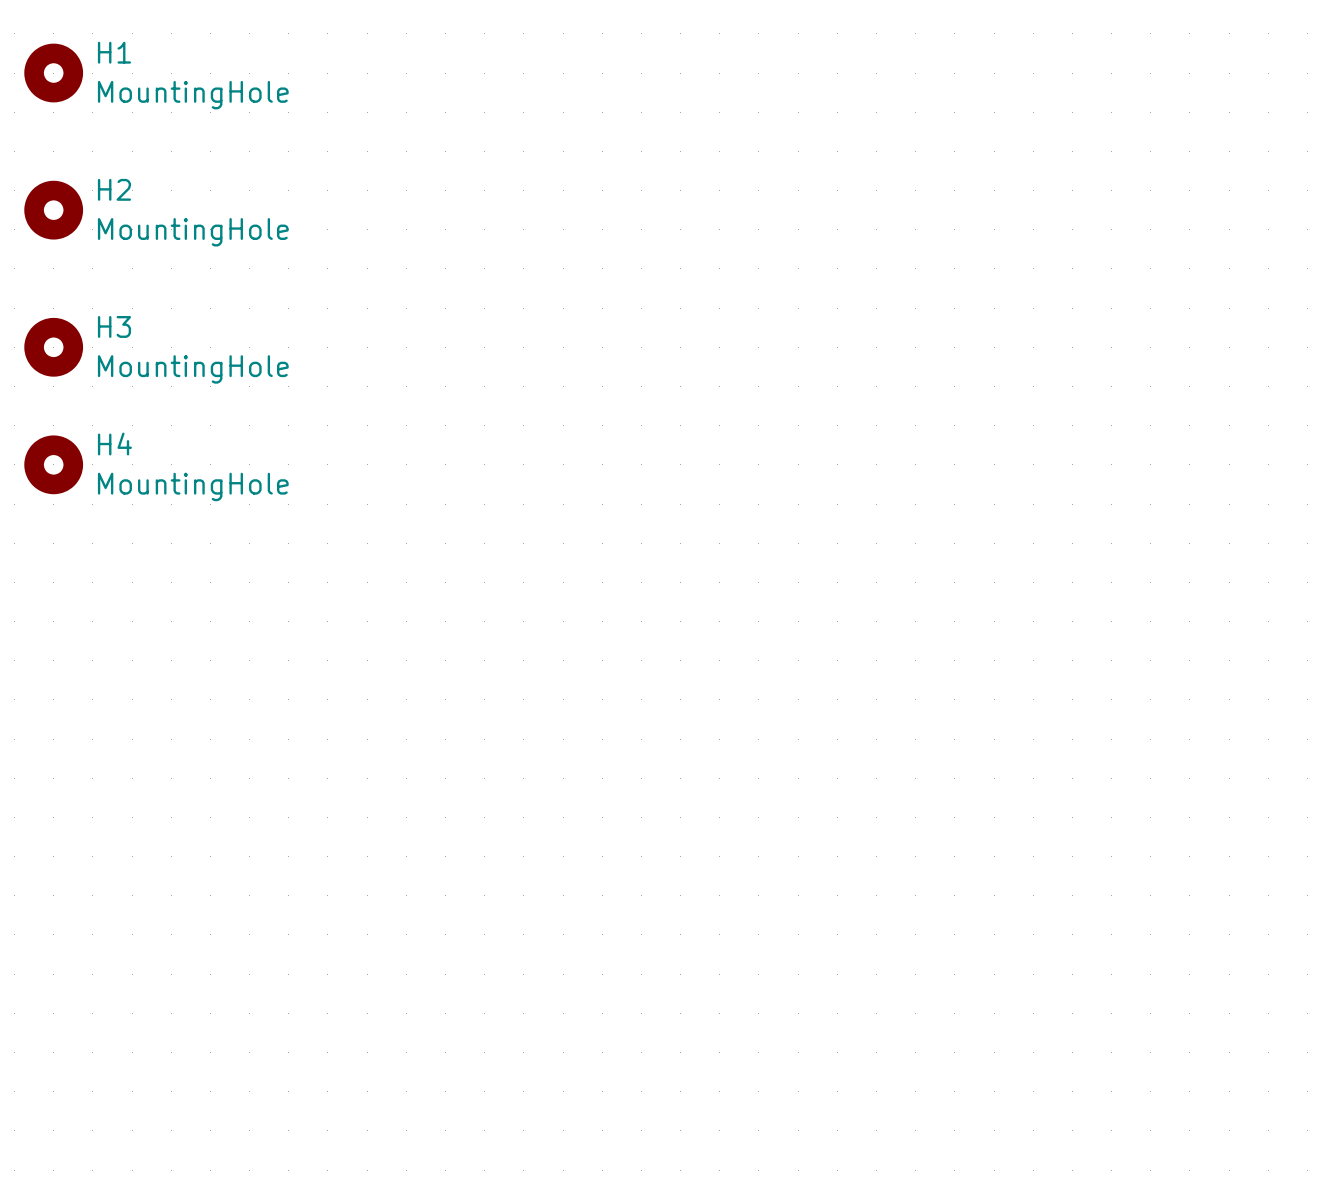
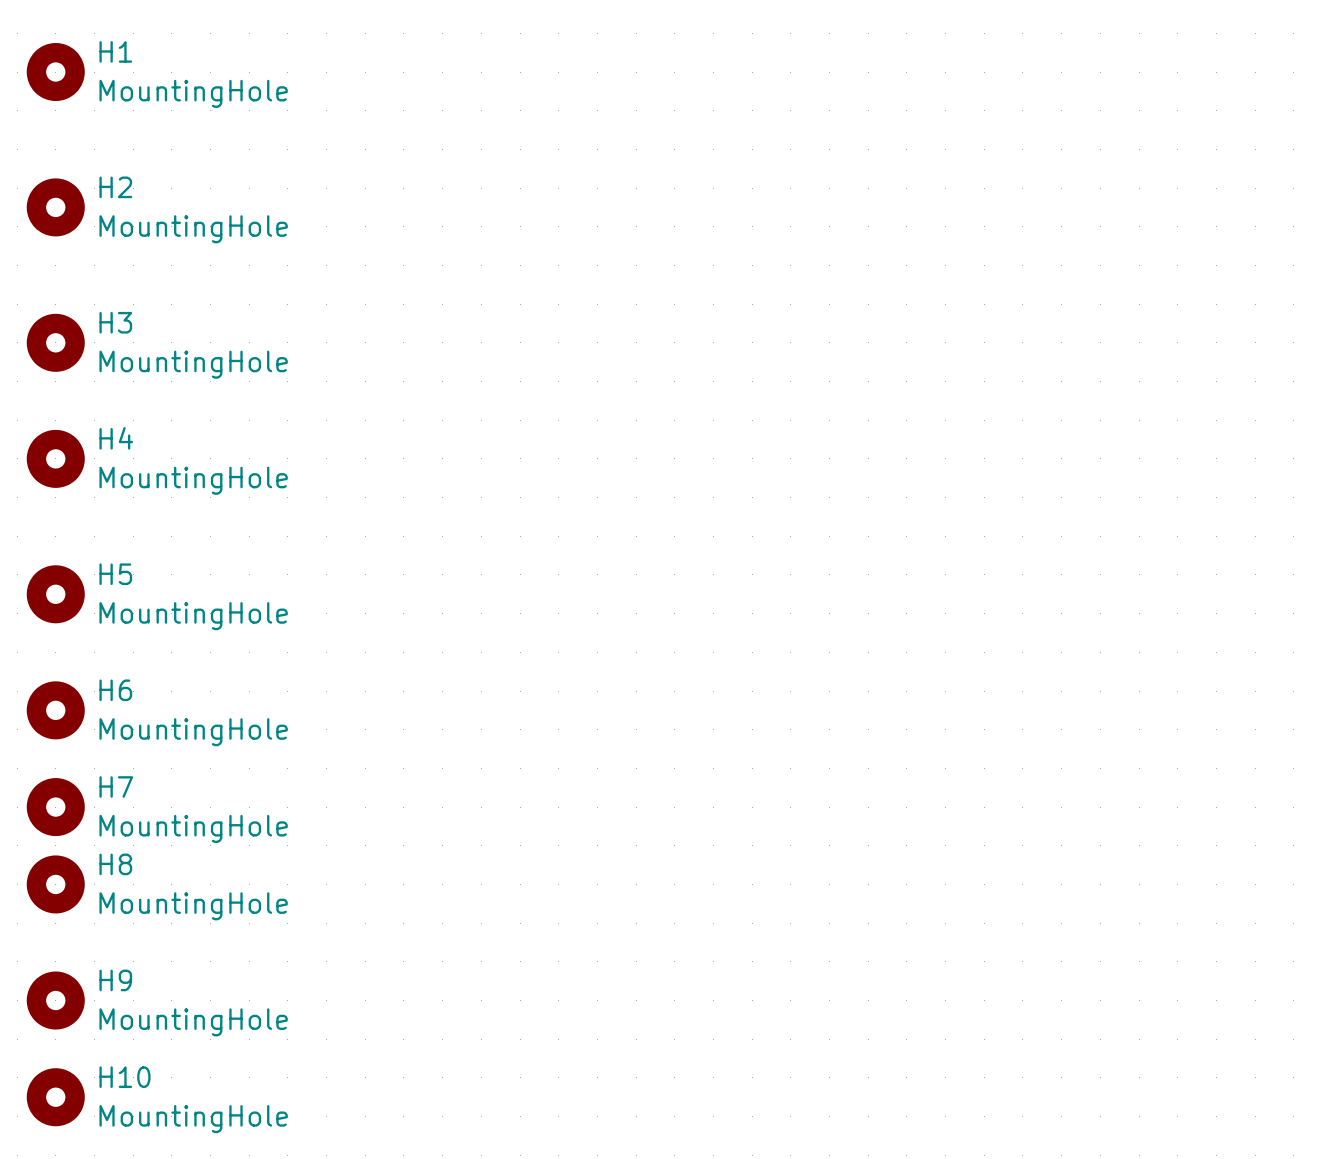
H5: none -> MountingHole (55, 594)
H6: none -> MountingHole (55, 710)
H7: none -> MountingHole (55, 807)
H8: none -> MountingHole (55, 884)
H9: none -> MountingHole (55, 1000)
H10: none -> MountingHole (55, 1097)

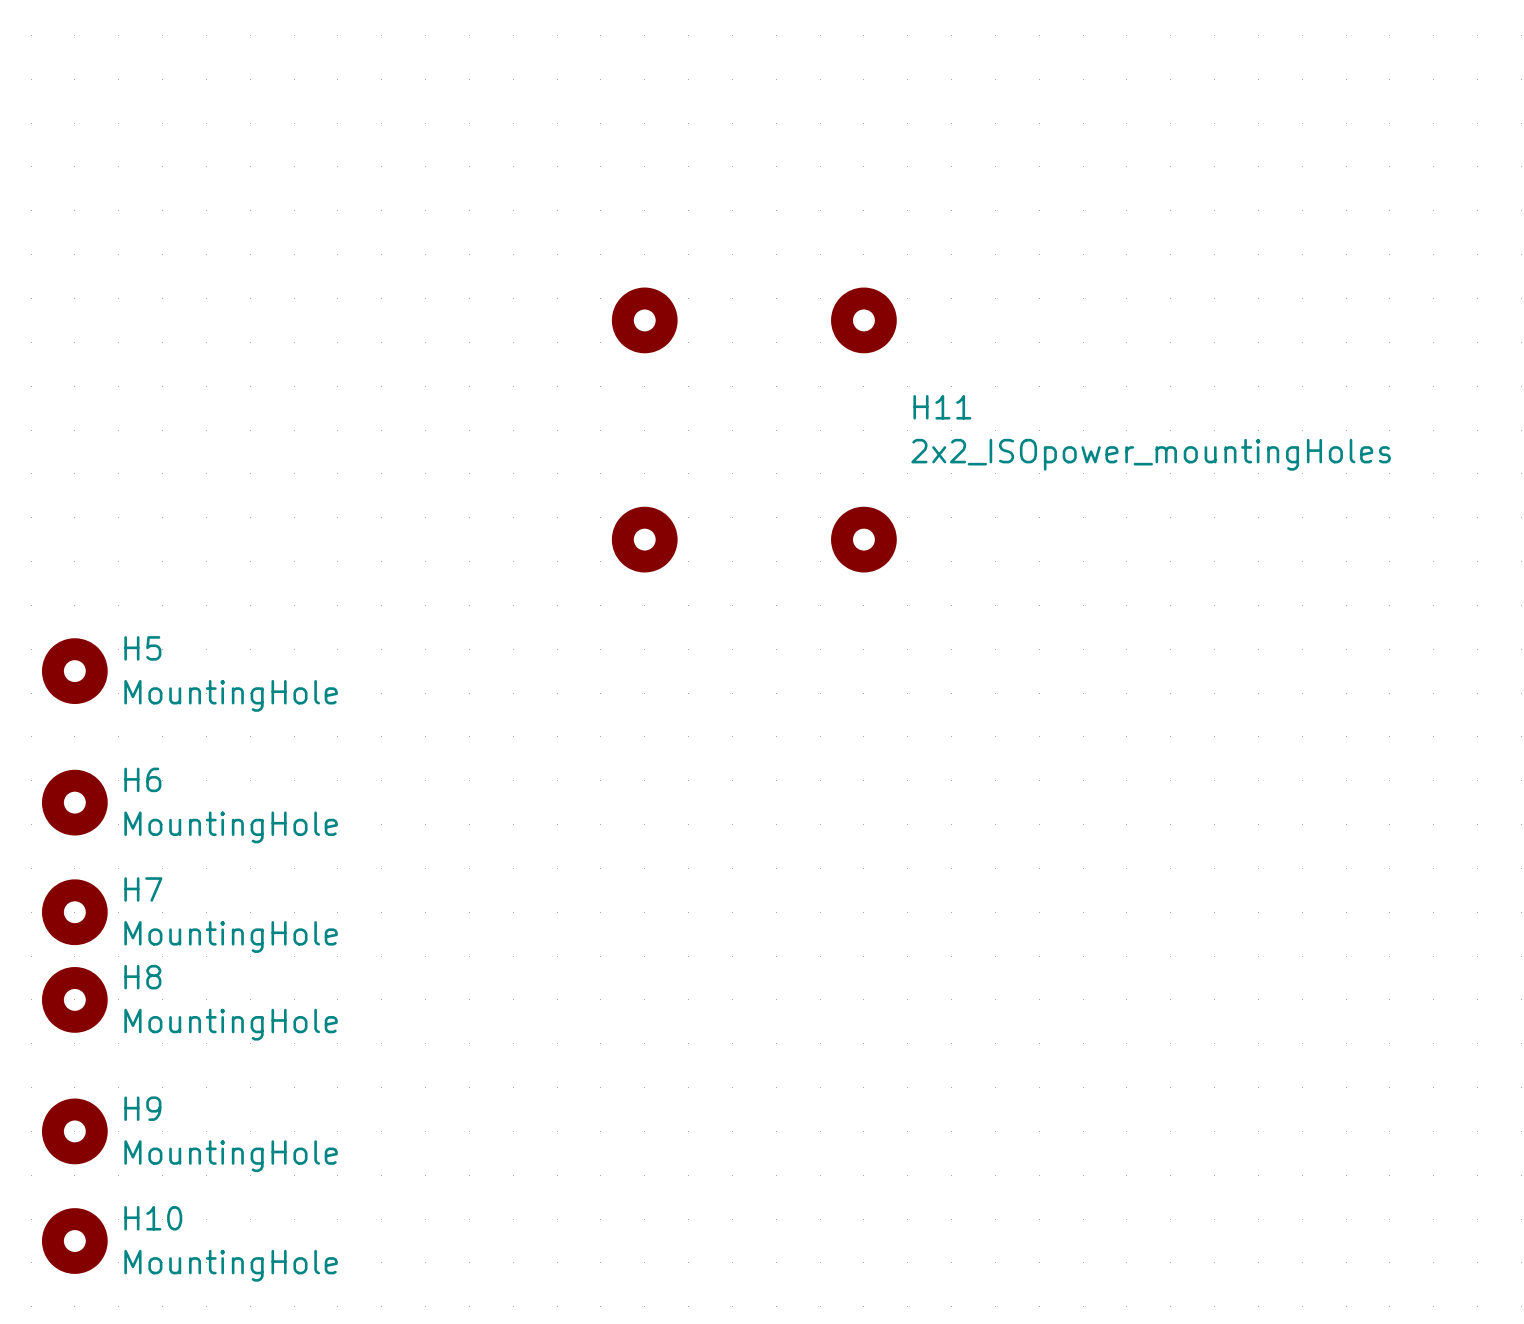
H1: MountingHole (55, 72) -> none
H2: MountingHole (55, 207) -> none
H3: MountingHole (55, 342) -> none
H11: none -> 2x2_ISOpower_mountingHoles (754, 430)
H4: MountingHole (55, 458) -> none

